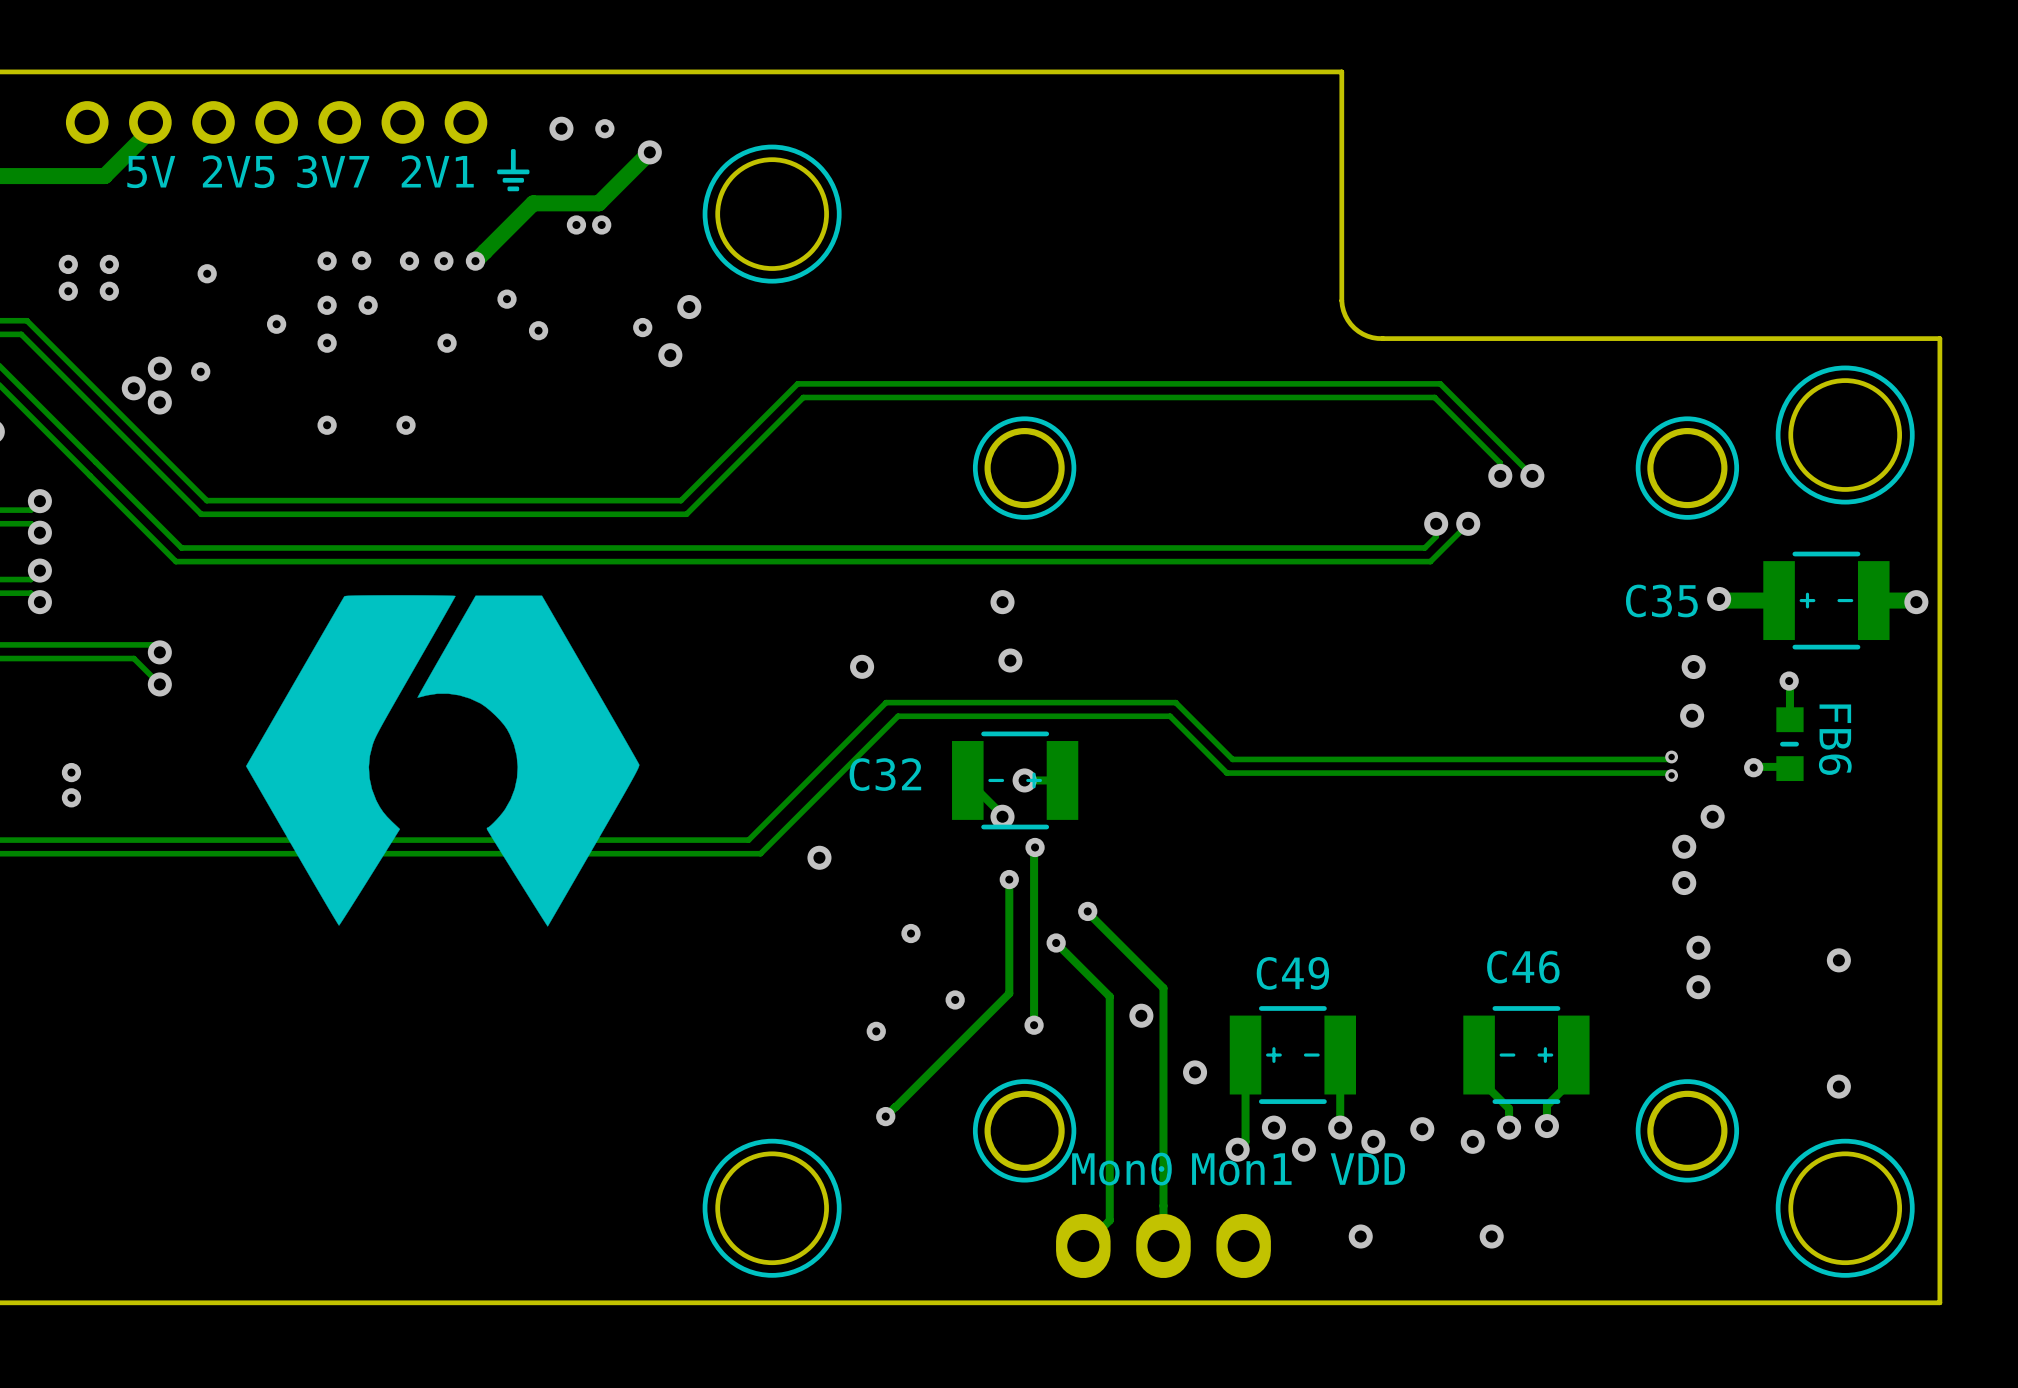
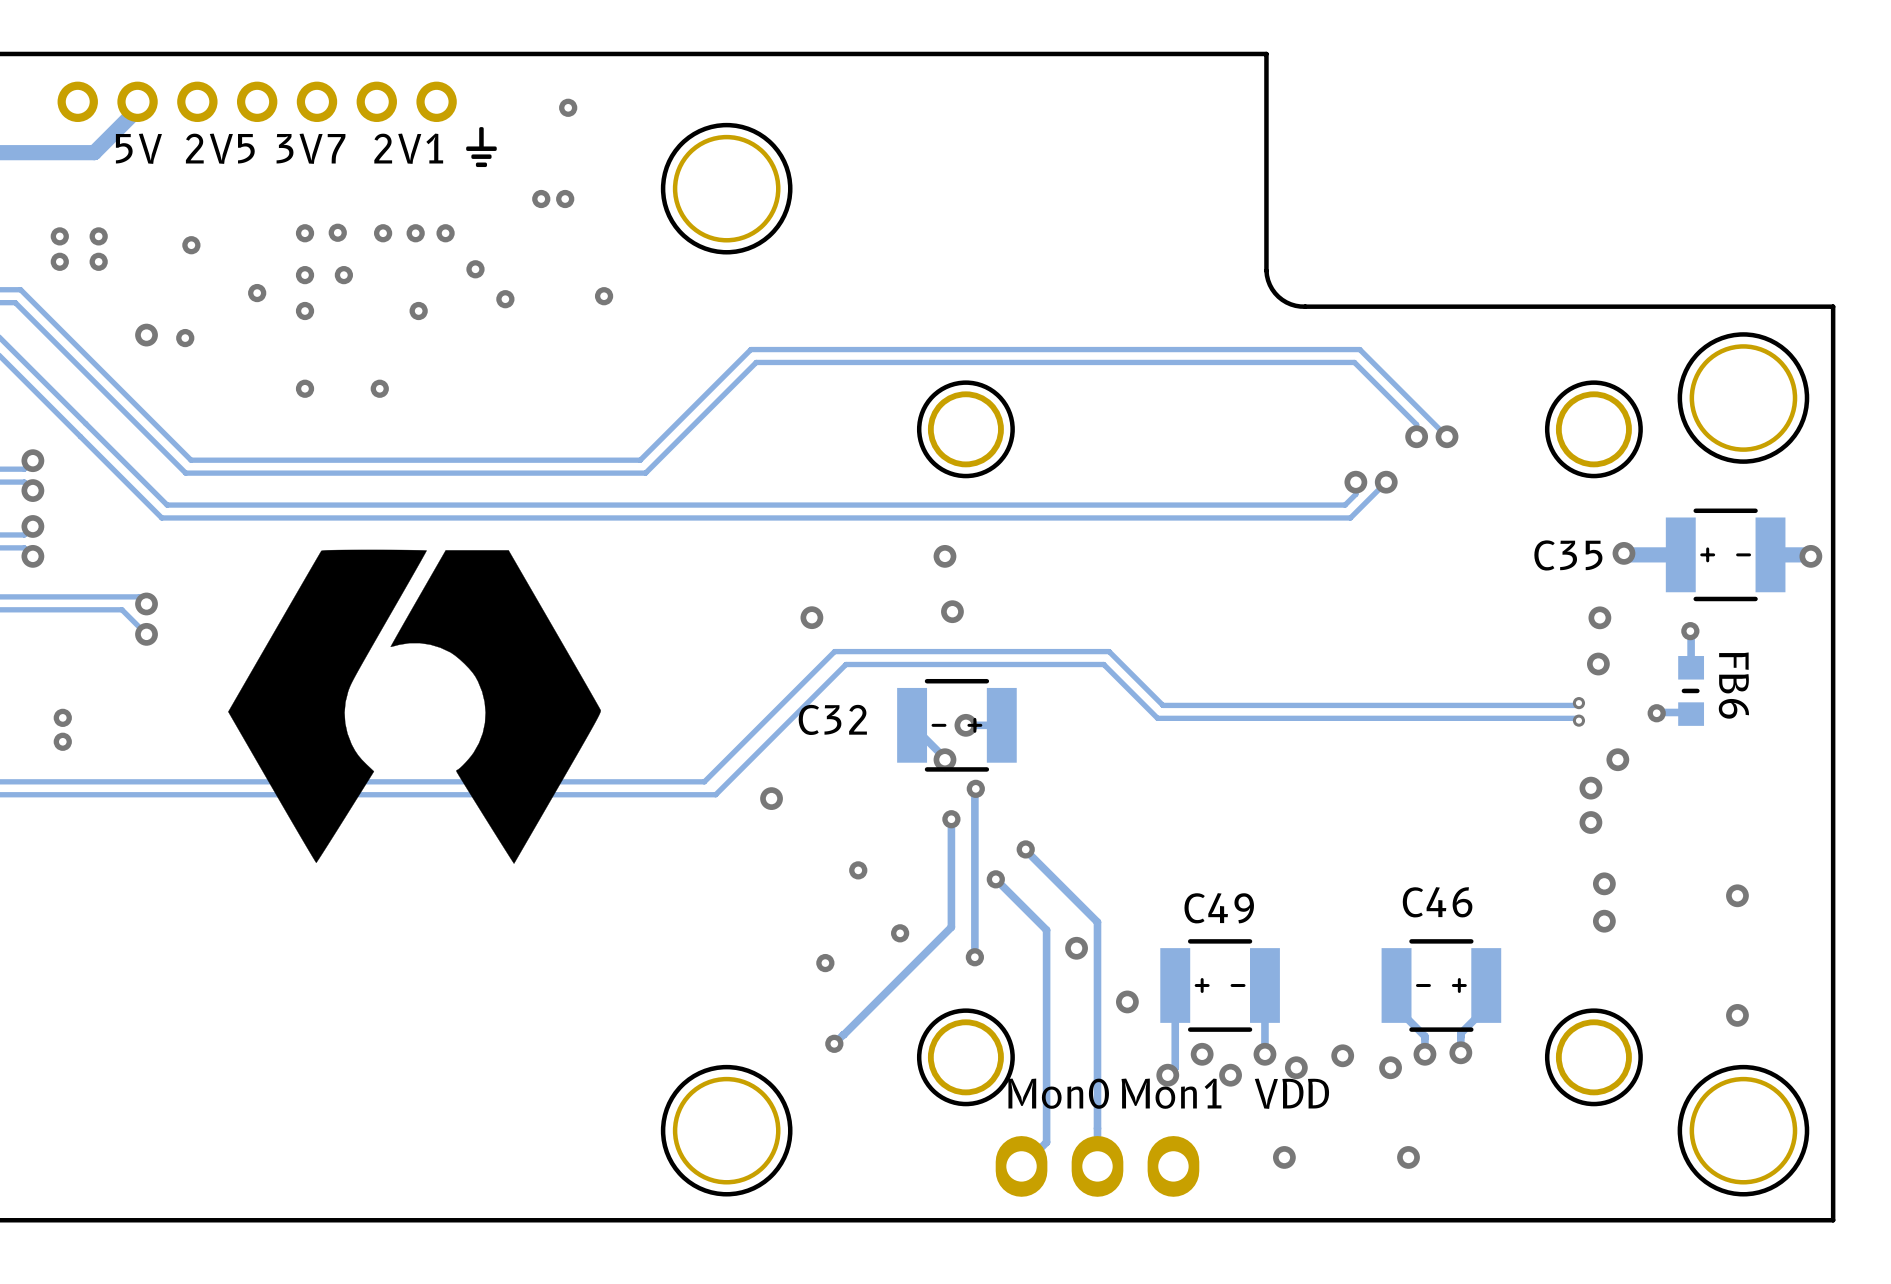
via: (561, 128) -> none
track: (649, 152) (598, 203) (533, 203) (475, 261) -> none
via: (649, 152) -> none
via: (689, 307) -> none
via: (670, 355) -> none
via: (133, 388) -> none
via: (159, 402) -> none

